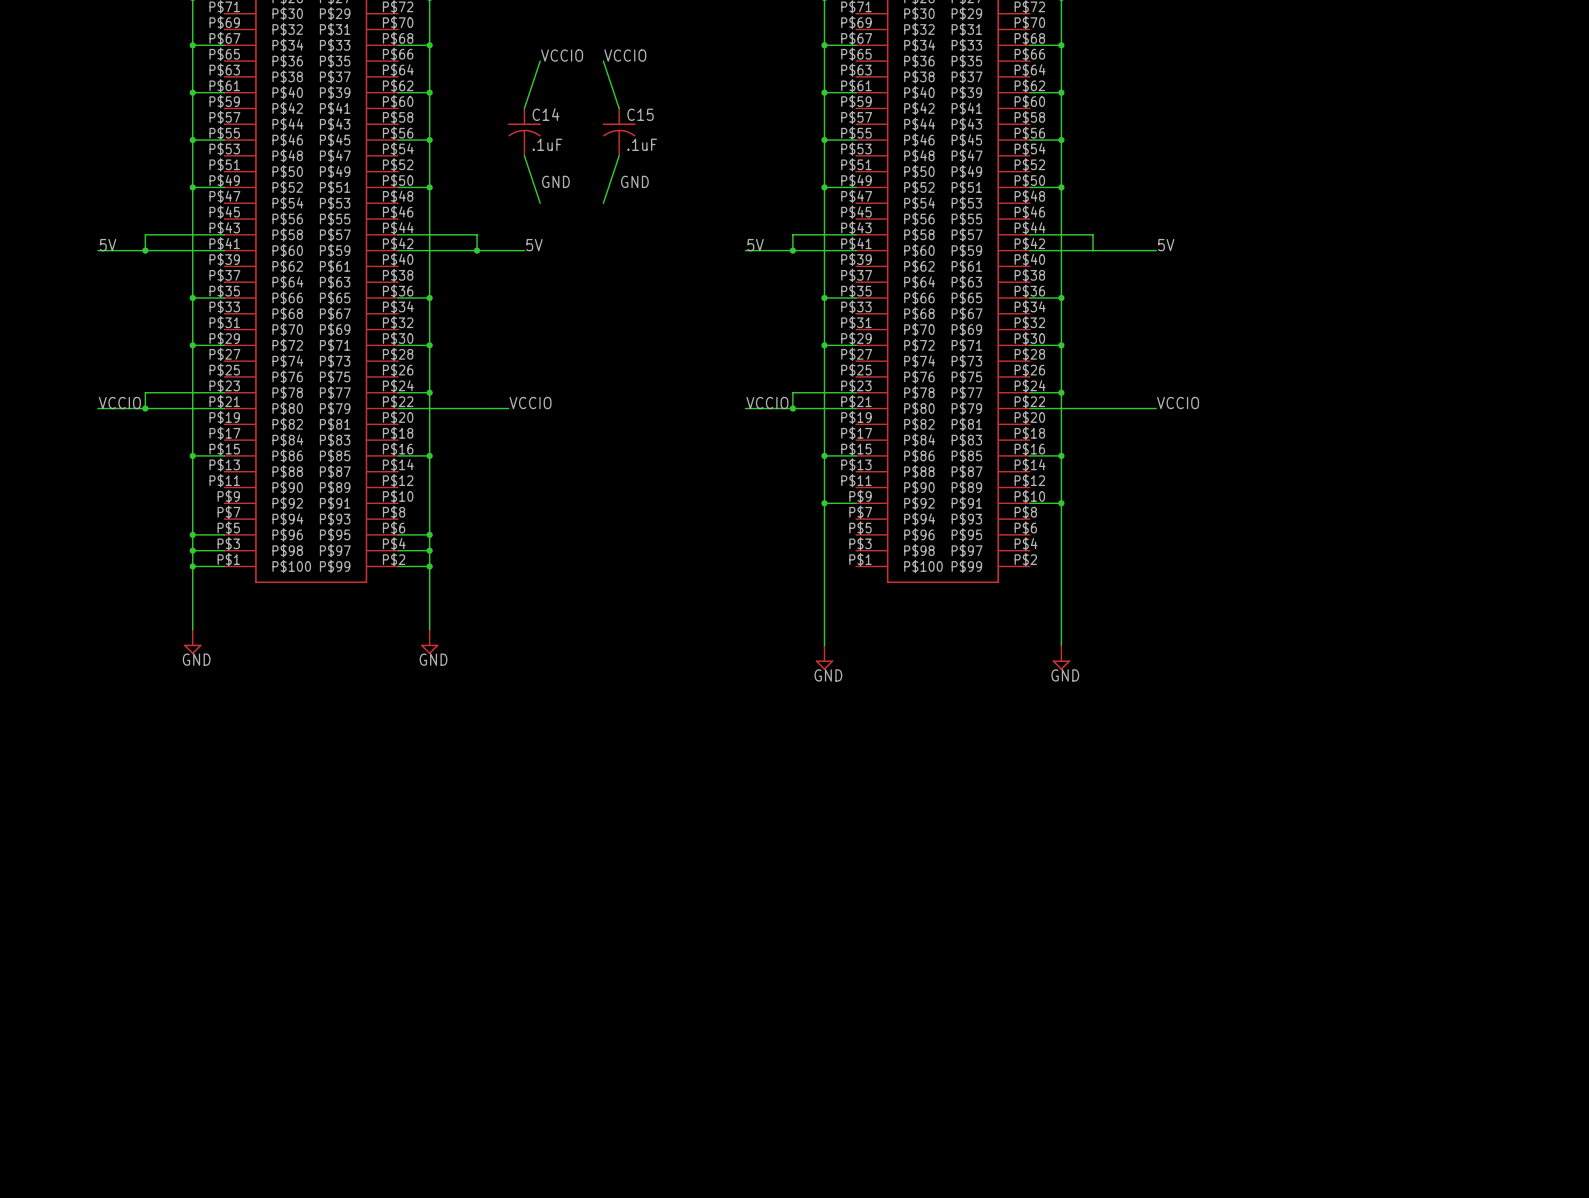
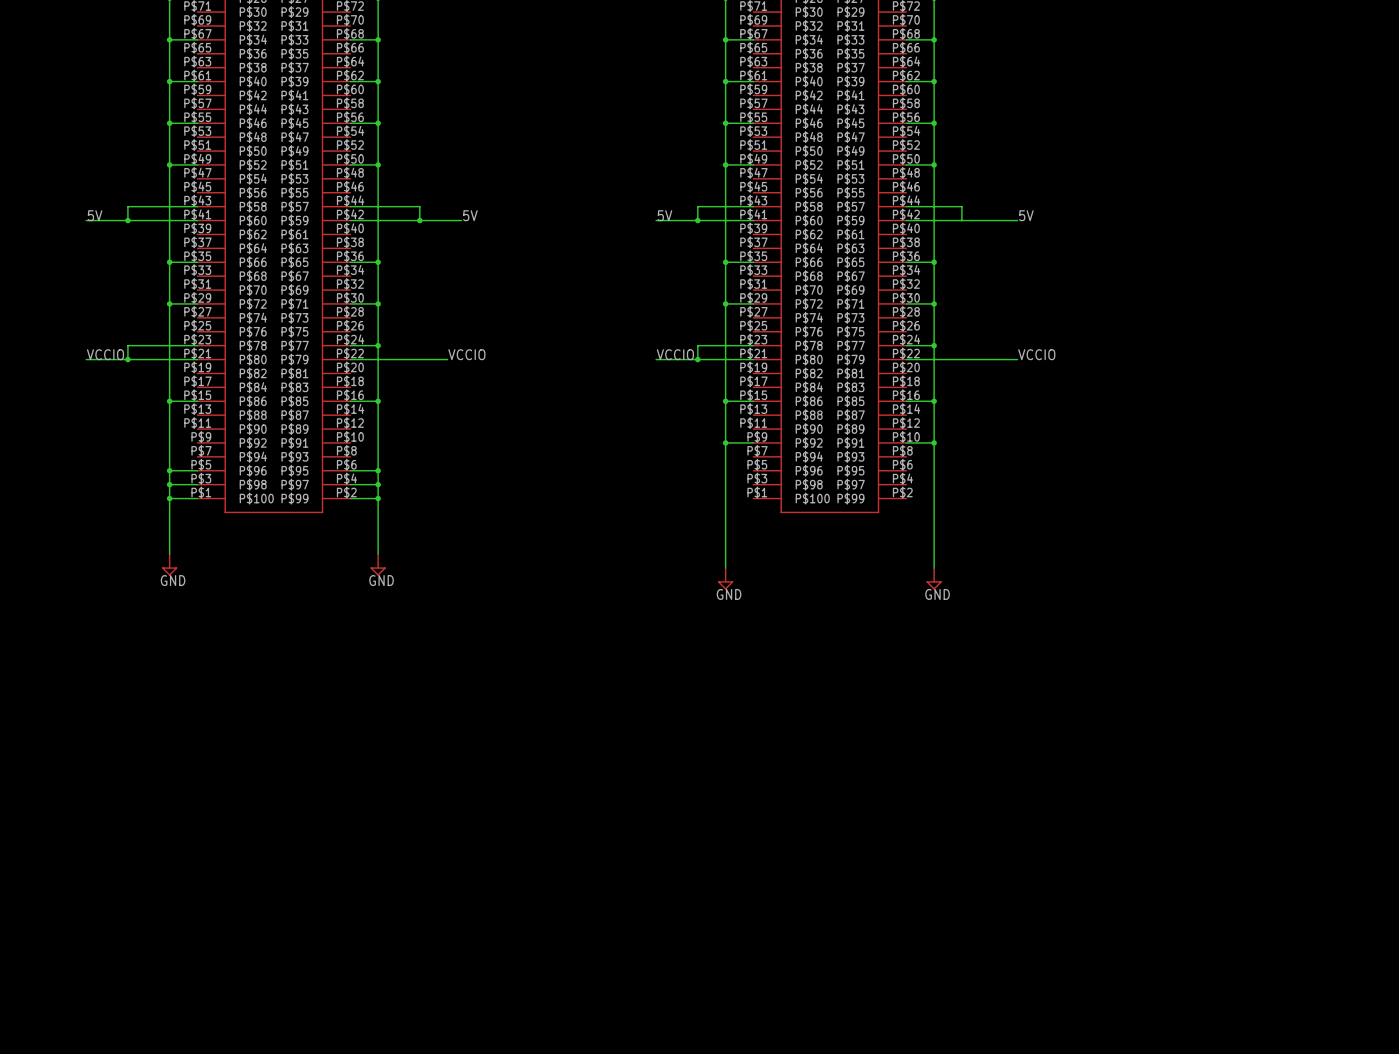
label: VCCIO (562, 55) -> none
label: VCCIO (625, 55) -> none
wire: (540, 61) (524, 108) -> none
wire: (603, 61) (619, 108) -> none
C14: .1uF (524, 132) -> none
C15: .1uF (619, 132) -> none
wire: (524, 155) (540, 203) -> none
wire: (619, 155) (603, 203) -> none
label: GND (555, 181) -> none
label: GND (634, 181) -> none

